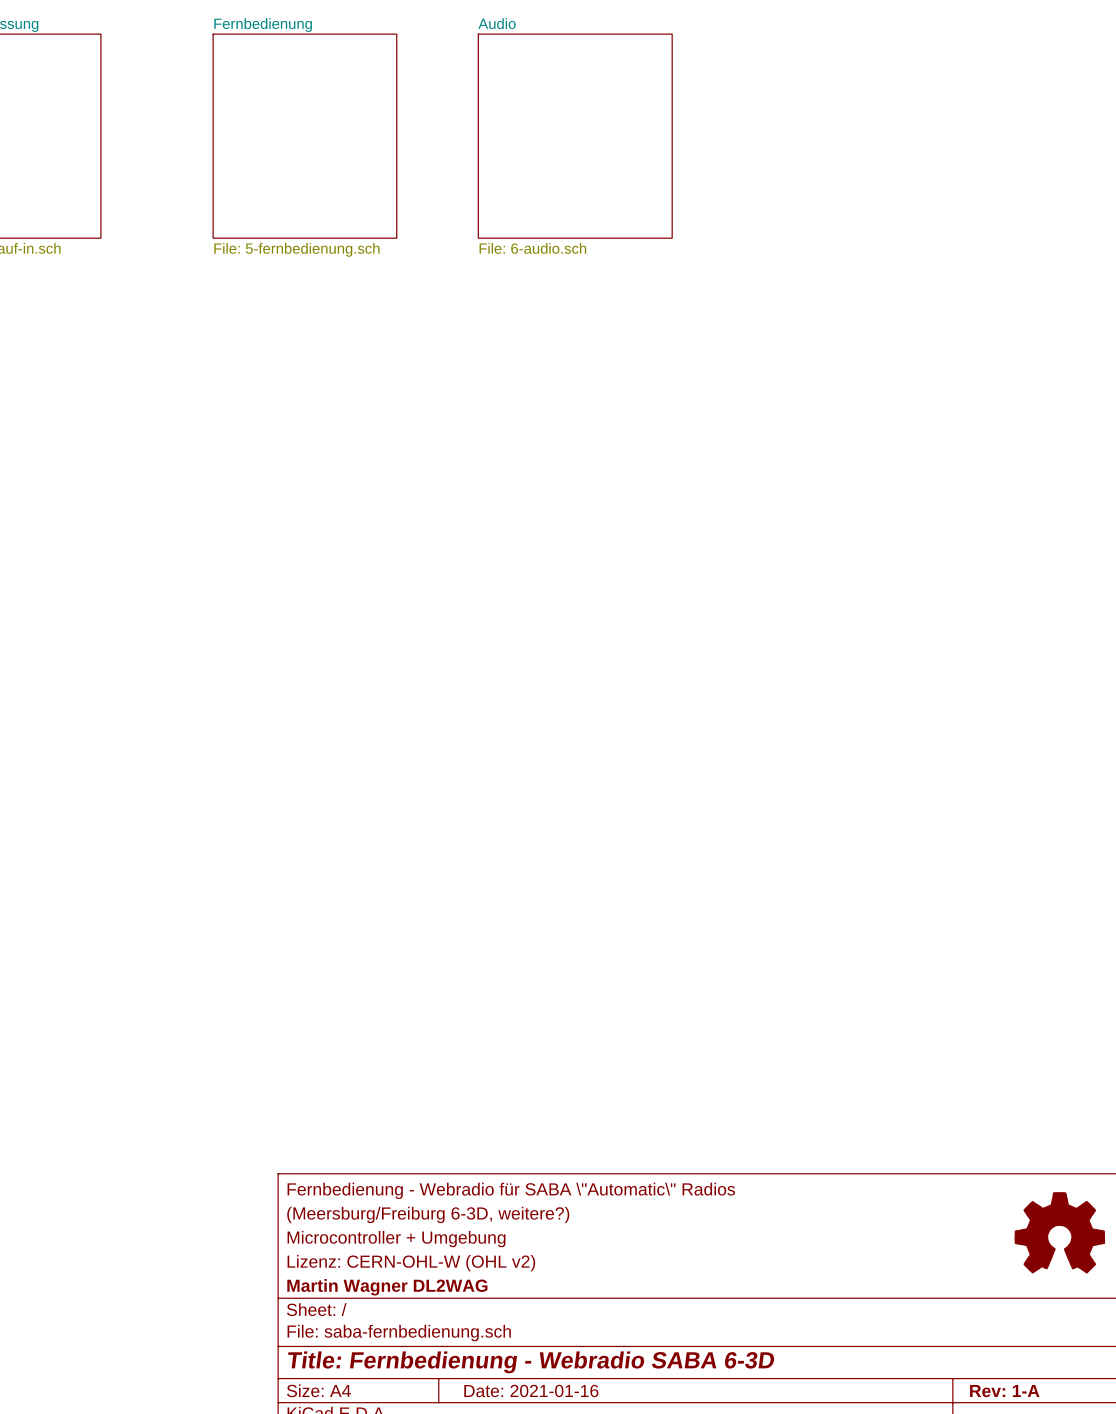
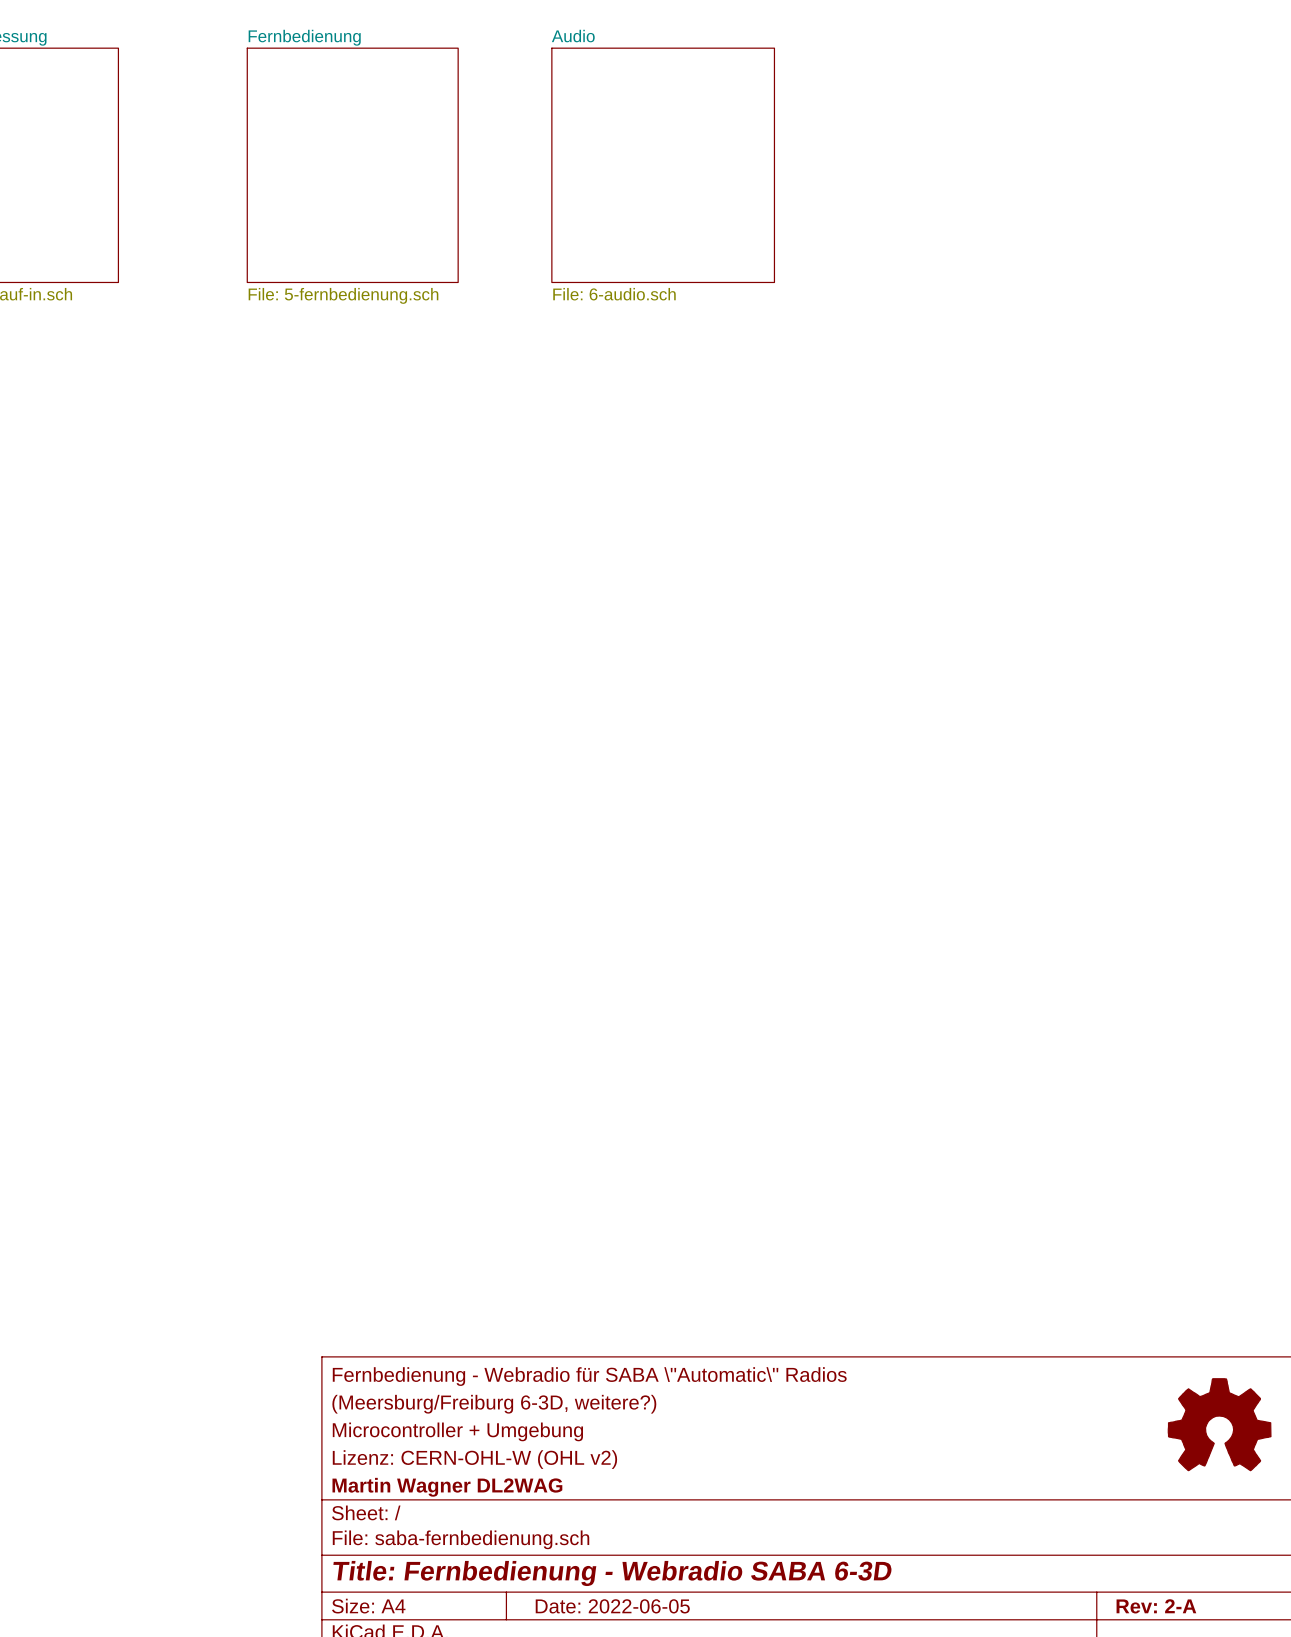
title block: Date: 2021-01-16 (531, 1390) -> Date: 2022-06-05 (612, 1606)
title block: Rev: 1-A (1004, 1391) -> Rev: 2-A (1156, 1606)

